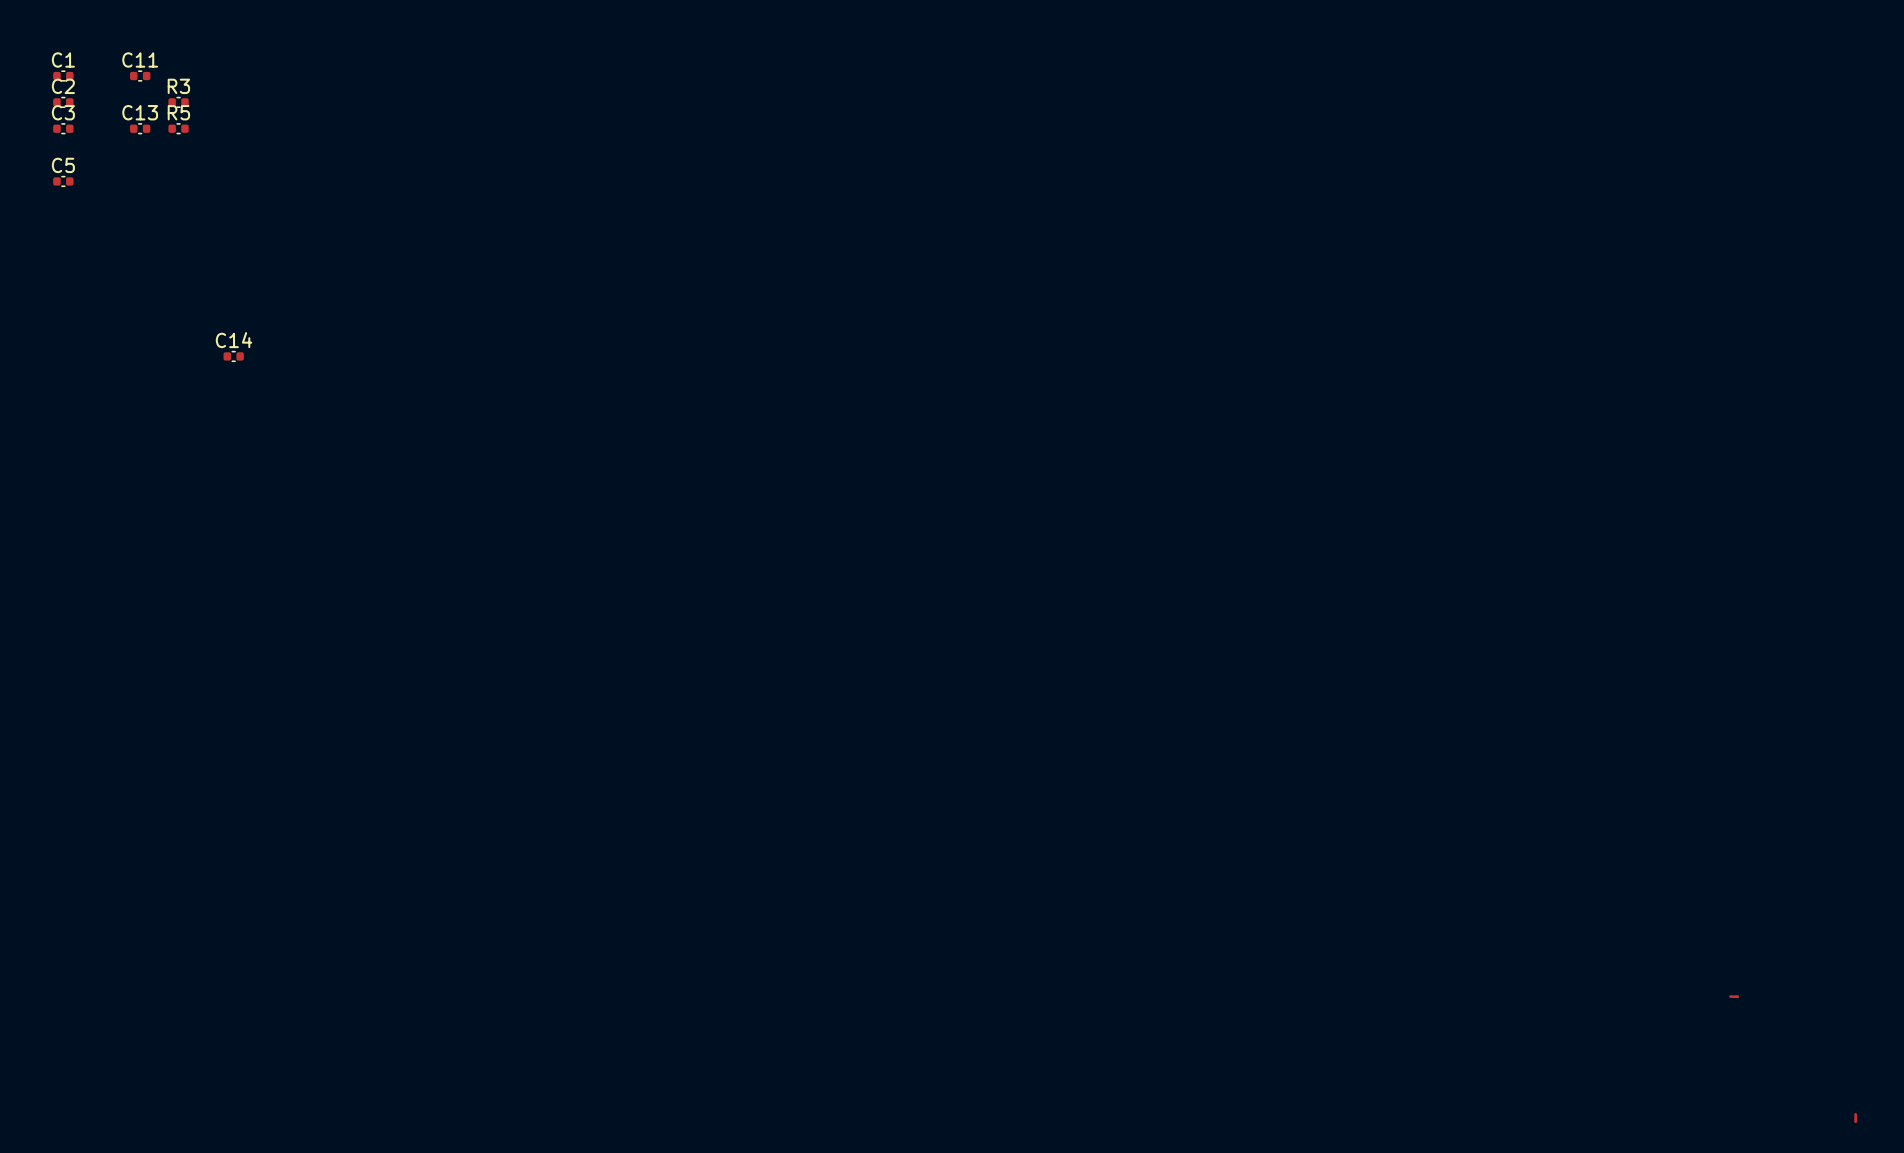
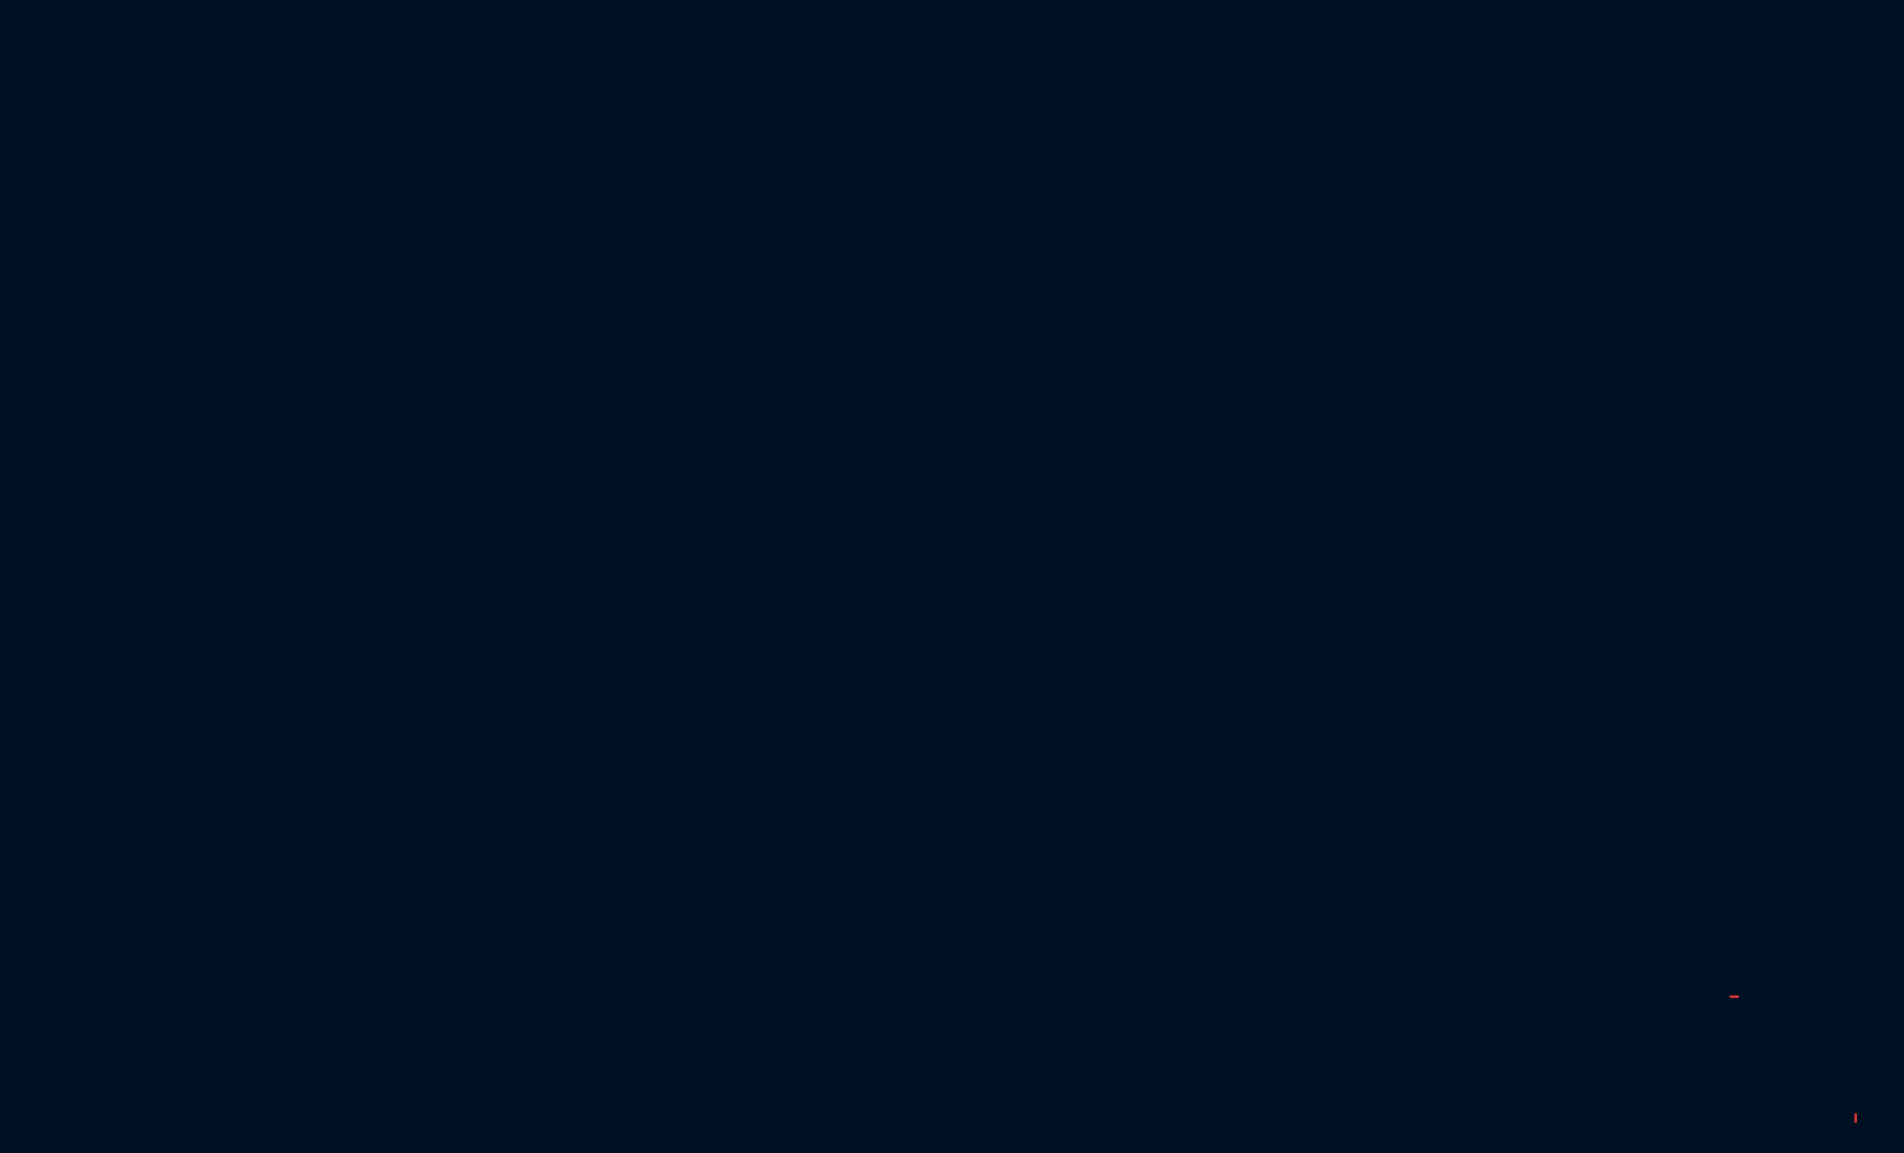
C1: (63, 76) -> none
C11: (140, 76) -> none
C2: (63, 102) -> none
R3: (178, 102) -> none
C3: (63, 128) -> none
C13: (140, 128) -> none
R5: (178, 128) -> none
C5: (63, 181) -> none
C14: (233, 356) -> none

